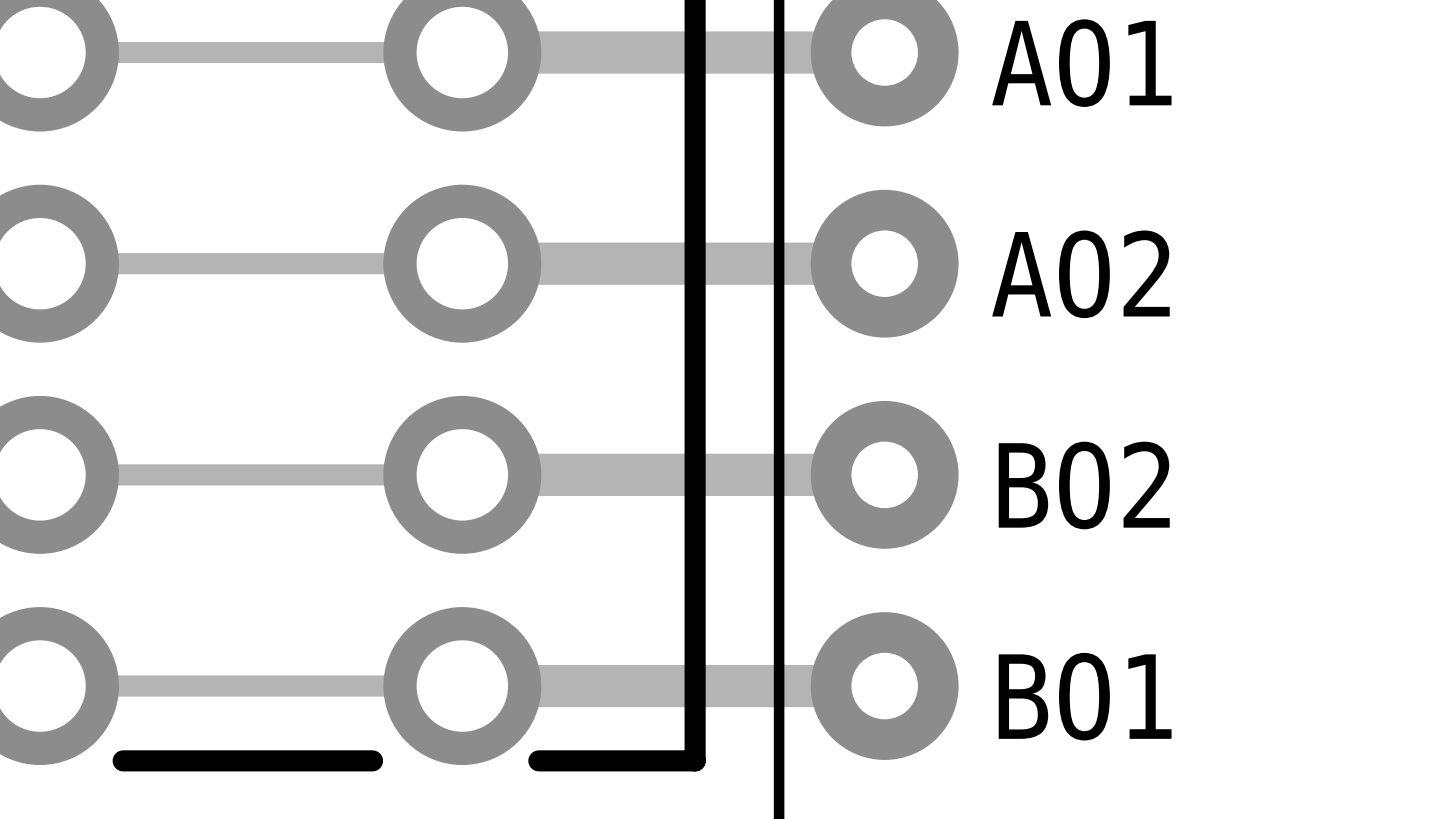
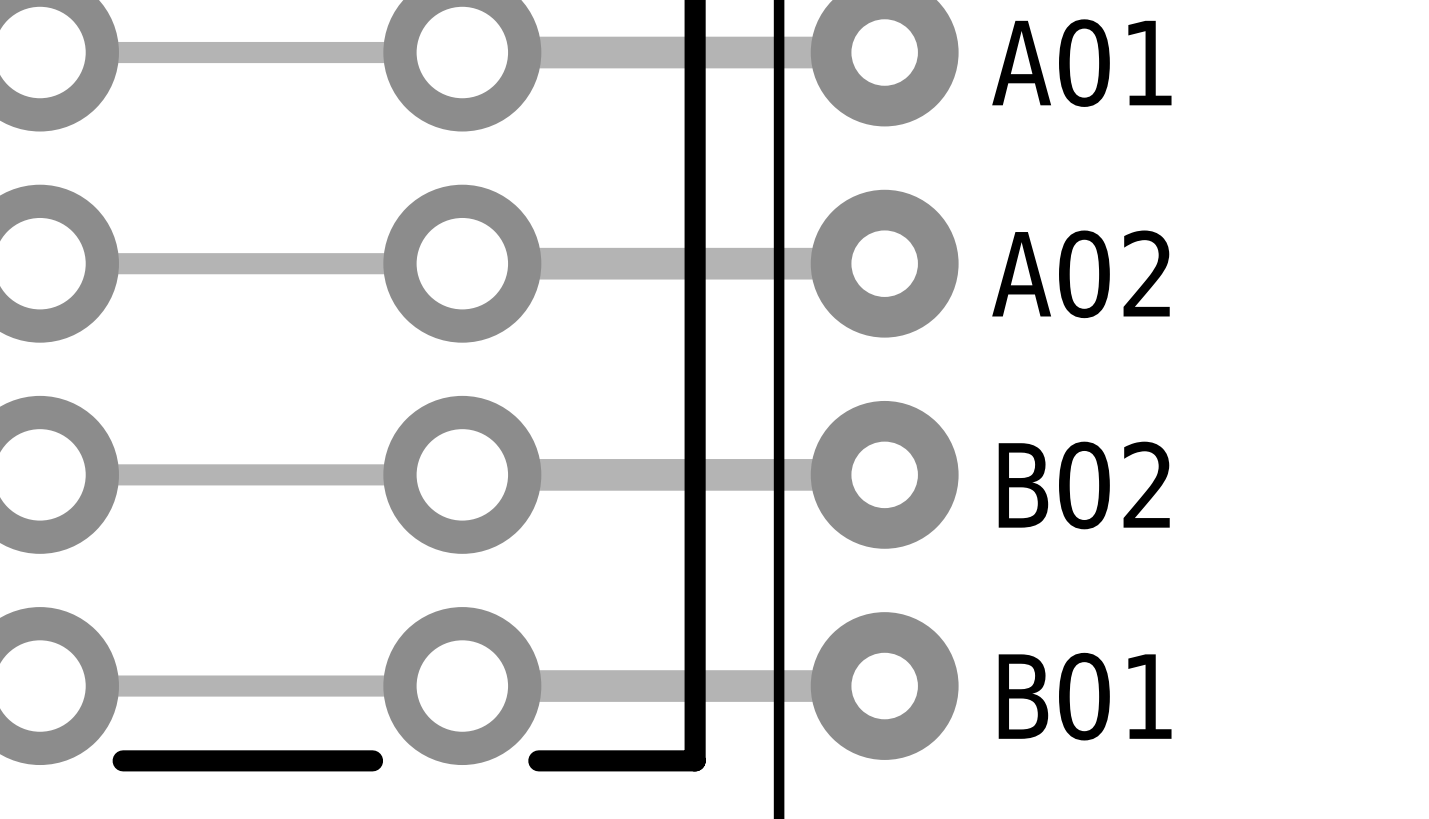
track width: thick (884, 52) (462, 52) -> thin (884, 52) (462, 52)
track width: thick (884, 263) (462, 263) -> thin (884, 263) (462, 263)
track width: thick (884, 474) (462, 474) -> thin (884, 474) (462, 474)
track width: thick (884, 686) (462, 686) -> thin (884, 686) (462, 686)

